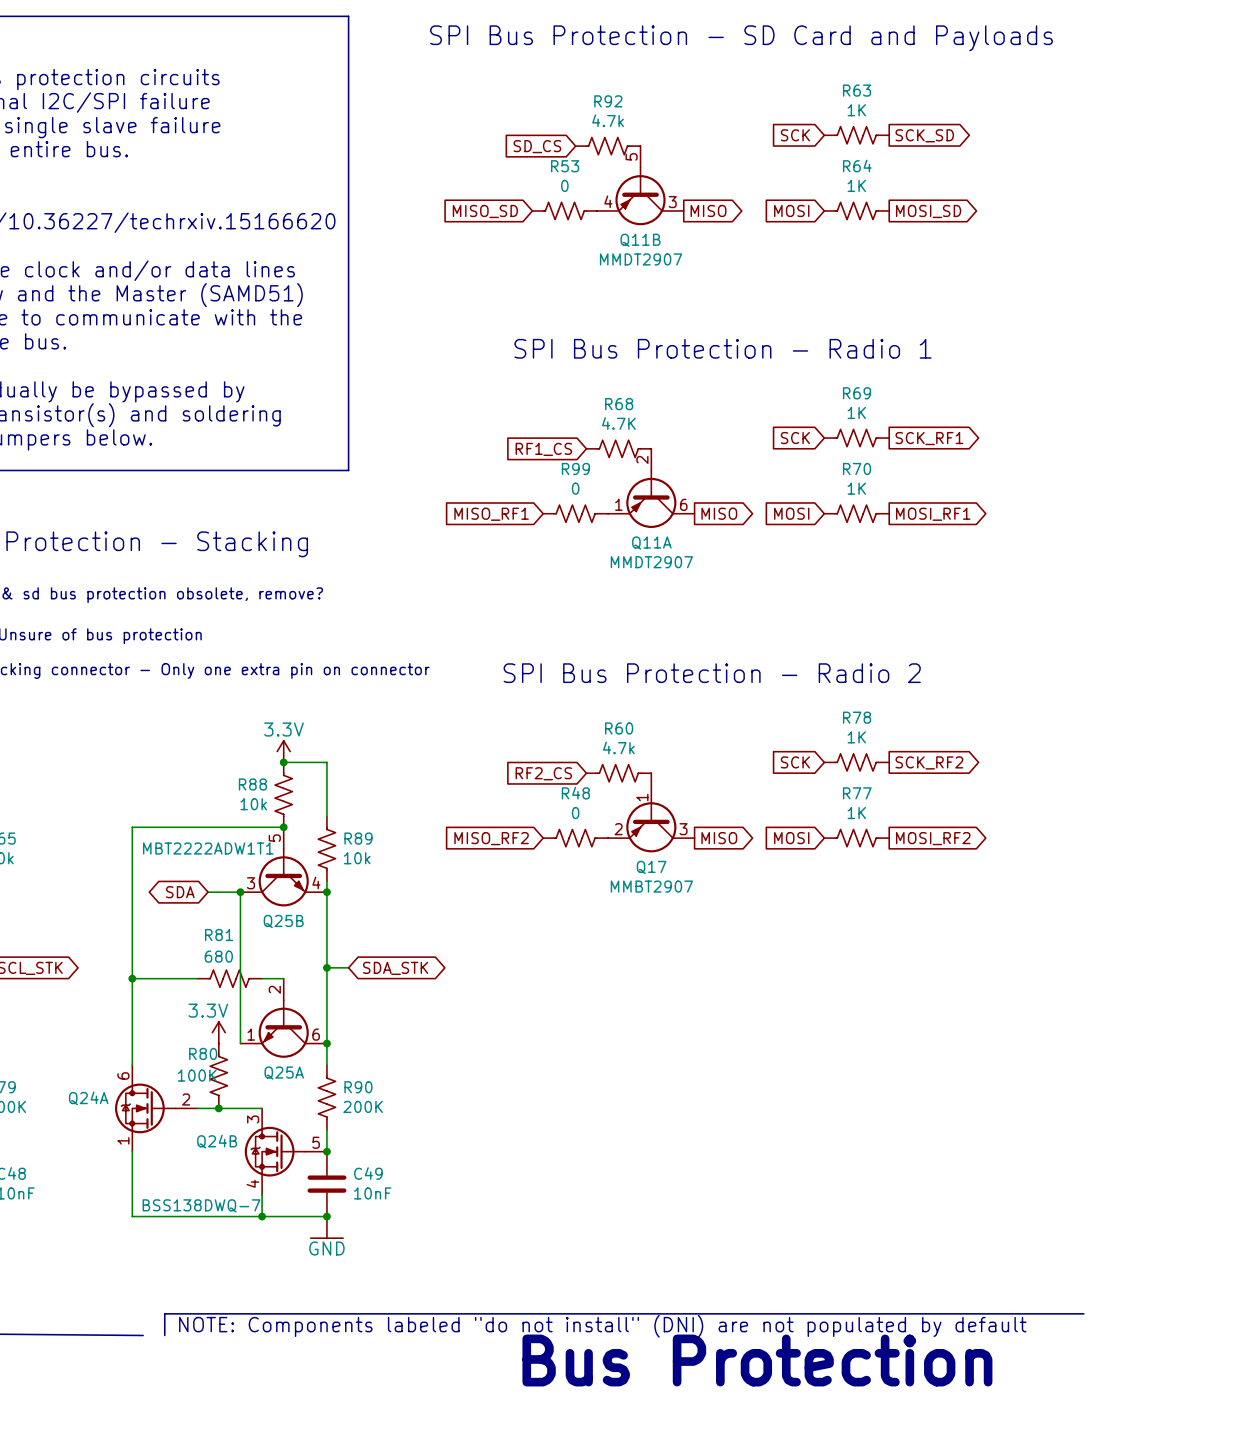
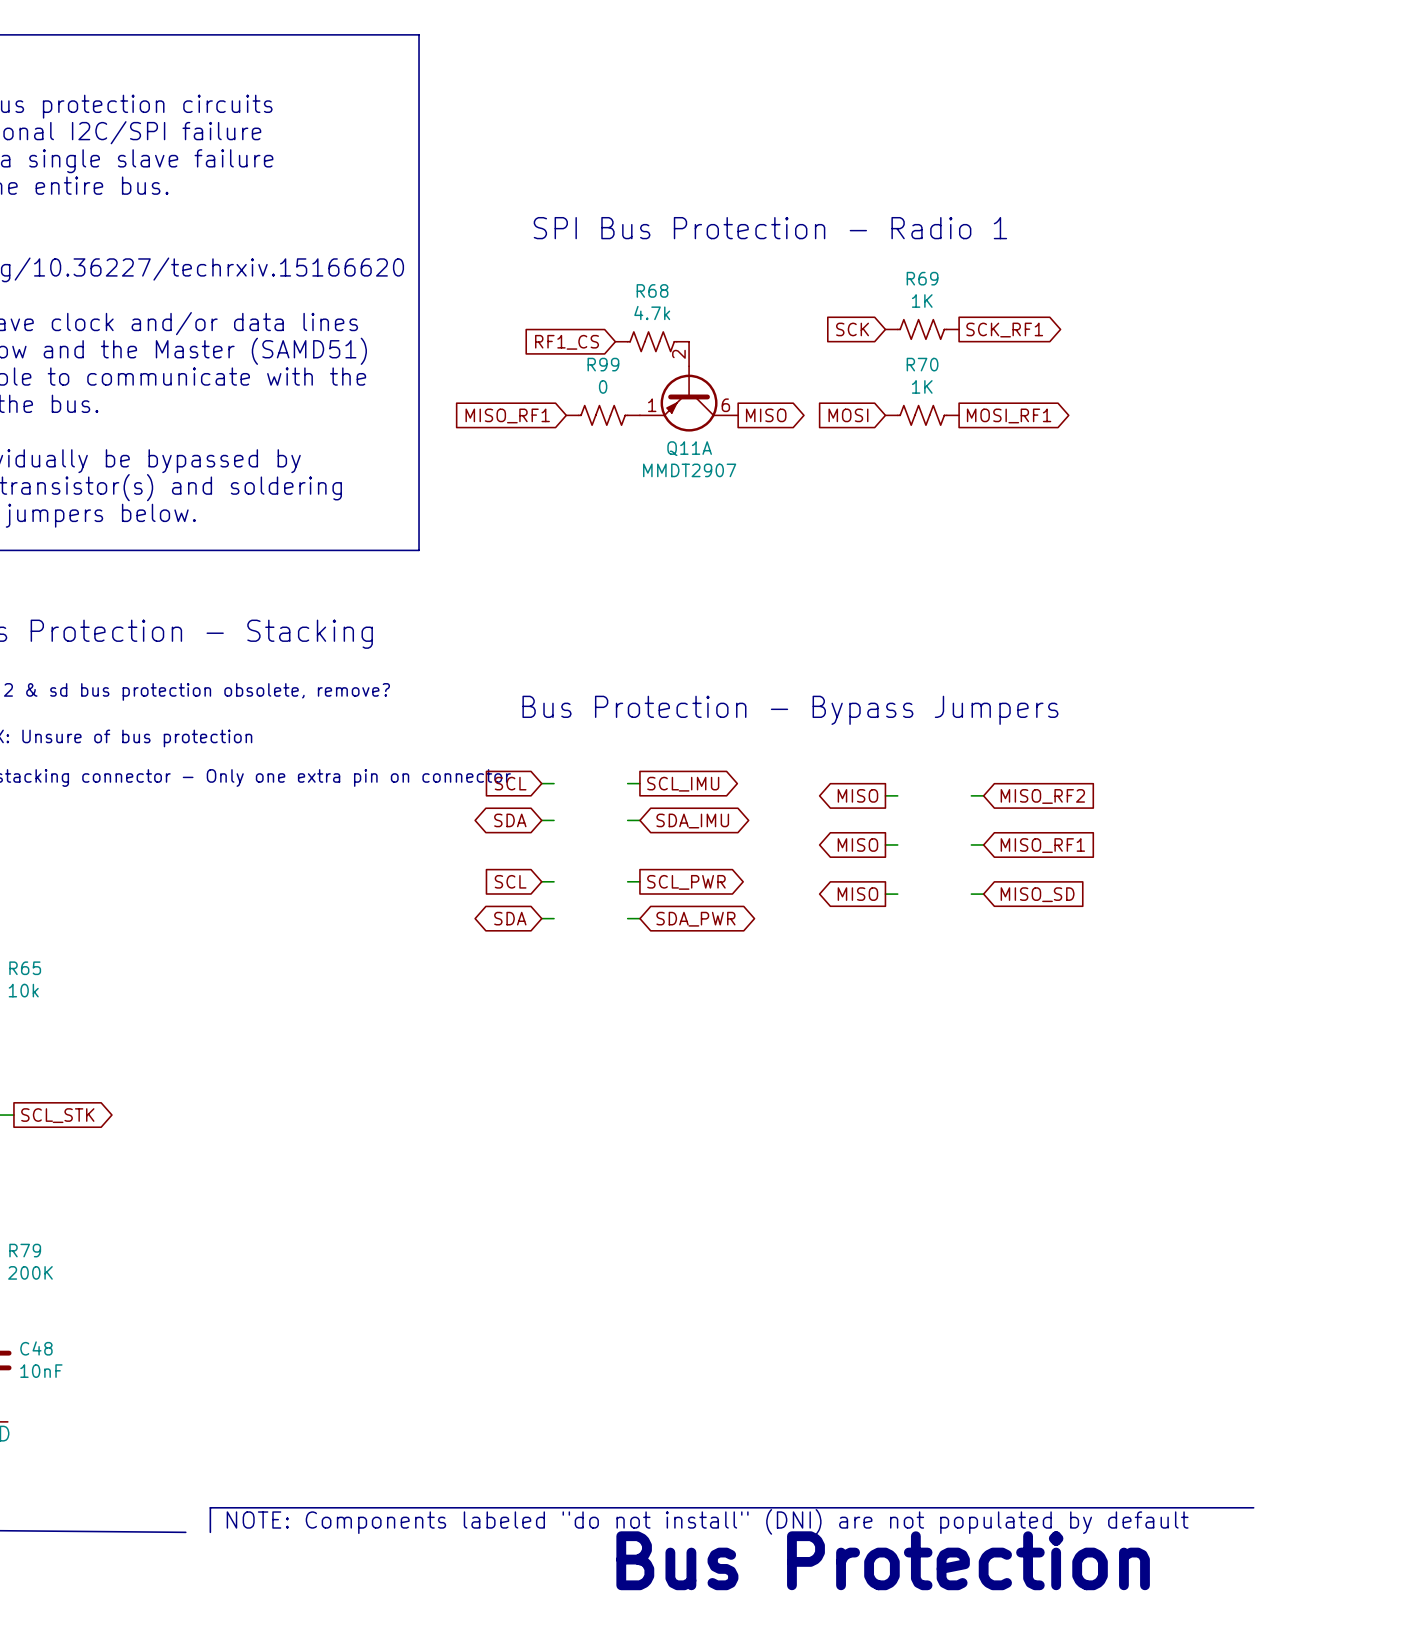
text: SPI Bus Protection - SD Card and Payloads (741, 38) -> none
global label: SCK (795, 135) -> none
R63: 1K (856, 135) -> none
global label: SCK_SD (924, 135) -> none
global label: SD_CS (537, 146) -> none
R92: 4.7k (608, 146) -> none
Q11B: MMDT2907 (640, 185) -> none
R53: 0 (564, 210) -> none
global label: MISO (708, 210) -> none
global label: MOSI (791, 210) -> none
R64: 1K (856, 210) -> none
global label: MISO_SD (485, 211) -> none
global label: MOSI_SD (928, 211) -> none
global label: none -> SCK (852, 329)
text position: SPI Bus Protection - Radio 1 (723, 348) -> SPI Bus Protection - Radio 1 (770, 228)
global label: none -> MISO (766, 415)
global label: none -> MOSI (848, 415)
R68 value: 4.7K (618, 423) -> 4.7k (652, 313)
global label: SCK (795, 438) -> none
R69 position: (856, 438) -> (922, 329)
global label position: SCK_RF1 (929, 438) -> SCK_RF1 (1004, 330)
R68 position: (618, 448) -> (652, 341)
global label position: RF1_CS (543, 449) -> RF1_CS (567, 342)
Q11A position: (651, 488) -> (689, 386)
R99 position: (575, 513) -> (603, 415)
global label: MISO (719, 513) -> none
global label: MOSI (791, 513) -> none
R70 position: (856, 513) -> (922, 415)
global label position: MISO_RF1 (491, 514) -> MISO_RF1 (507, 415)
global label position: MOSI_RF1 (933, 514) -> MOSI_RF1 (1009, 415)
text: none -> Bus Protection - Bypass Jumpers (790, 710)
text: SPI Bus Protection - Radio 2 (712, 673) -> none
global label: none -> SCL (510, 783)
wire: none -> (541, 783) (554, 783)
wire: none -> (627, 783) (639, 783)
global label: none -> SCL_IMU (683, 784)
global label: none -> MISO (857, 795)
wire: none -> (885, 795) (897, 795)
wire: none -> (971, 795) (983, 795)
global label: none -> MISO_RF2 (1042, 796)
global label: none -> SDA (510, 820)
wire: none -> (541, 820) (554, 820)
wire: none -> (627, 820) (639, 820)
global label: none -> SDA_IMU (692, 821)
global label: none -> MISO (857, 844)
wire: none -> (885, 844) (897, 844)
wire: none -> (971, 844) (983, 844)
global label: none -> MISO_RF1 (1042, 845)
power symbol: 3.3V (283, 751) -> none
wire: (283, 762) (326, 762) (326, 816) -> none
junction: (283, 762) -> none
global label: none -> SCL (510, 881)
wire: none -> (541, 881) (554, 881)
global label: none -> SCL_PWR (686, 882)
global label: SCK (795, 762) -> none
R78: 1K (856, 762) -> none
global label: SCK_RF2 (929, 762) -> none
global label: RF2_CS (543, 773) -> none
R60: 4.7k (618, 773) -> none
global label: none -> MISO (857, 894)
wire: none -> (885, 894) (897, 894)
wire: none -> (971, 894) (983, 894)
global label: none -> MISO_SD (1037, 894)
R88: 10k (283, 794) -> none
global label: none -> SDA (510, 918)
wire: none -> (541, 918) (554, 918)
wire: none -> (627, 918) (639, 918)
global label: none -> SDA_PWR (695, 919)
Q17: MMBT2907 (651, 812) -> none
wire: (283, 827) (132, 827) (132, 1065) -> none
junction: (283, 827) -> none
global label: MISO_RF2 (491, 838) -> none
R48: 0 (575, 838) -> none
global label: MISO (719, 838) -> none
global label: MOSI (791, 838) -> none
R77: 1K (856, 838) -> none
global label: MOSI_RF2 (933, 838) -> none
R89: 10k (326, 848) -> none
Q25B: MBT2222ADW1T1 (283, 866) -> none
wire: (326, 881) (326, 1065) -> none
global label: SDA (180, 892) -> none
wire: (208, 892) (240, 892) (240, 1043) -> none
junction: (240, 892) -> none
junction: (326, 892) -> none
wire: (326, 967) (348, 967) -> none
junction: (326, 967) -> none
global label: SDA_STK (395, 968) -> none
wire: (132, 978) (197, 978) -> none
junction: (132, 978) -> none
R81: 680 (229, 978) -> none
wire: (262, 978) (283, 978) -> none
Q25A: (283, 1018) -> none
power symbol: 3.3V (218, 1032) -> none
junction: (326, 1043) -> none
R80: 100K (218, 1075) -> none
R90: 200K (326, 1097) -> none
Q24A: BSS138DWQ-7 (156, 1108) -> none
wire: (197, 1108) (262, 1108) -> none
junction: (218, 1108) -> none
wire: (326, 1130) (326, 1151) -> none
wire: (132, 1151) (132, 1216) (326, 1216) -> none
Q24B: (285, 1151) -> none
junction: (326, 1151) -> none
C49: 10nF (326, 1184) -> none
wire: (262, 1194) (262, 1216) -> none
junction: (262, 1216) -> none
junction: (326, 1216) -> none
power symbol: GND (326, 1227) -> none

